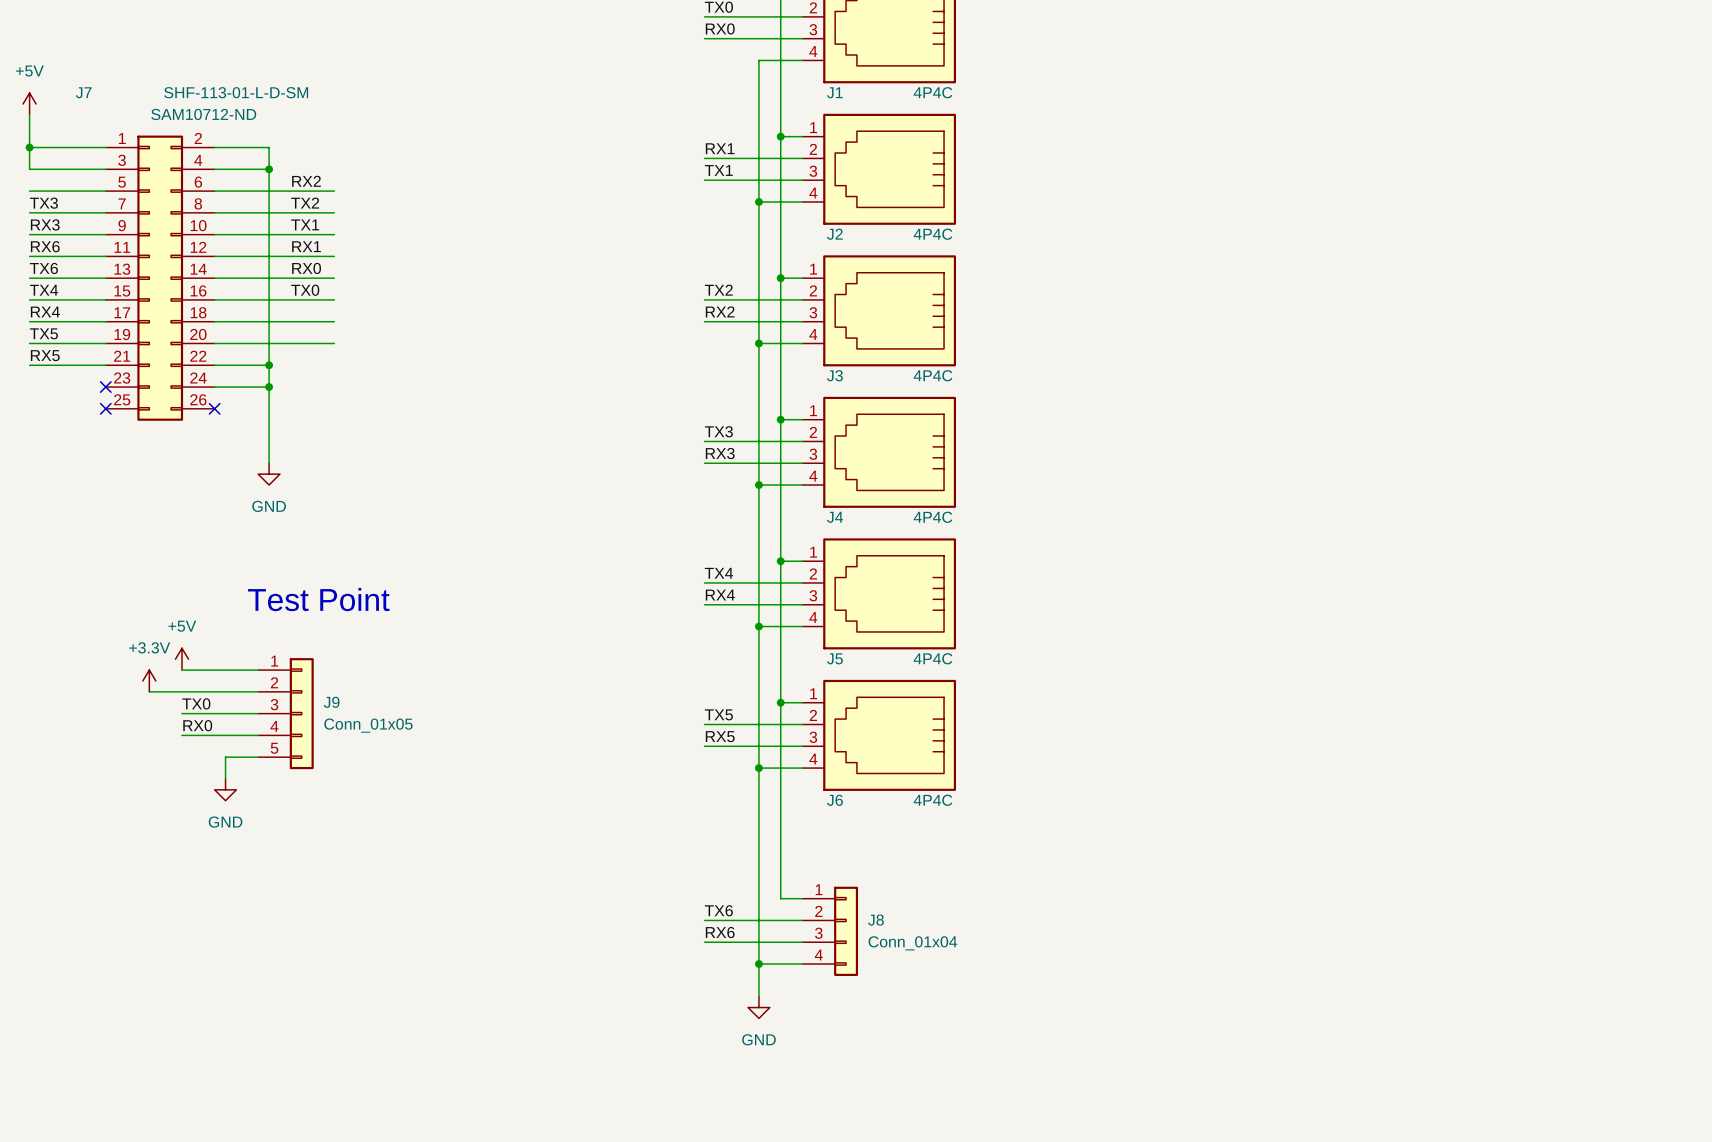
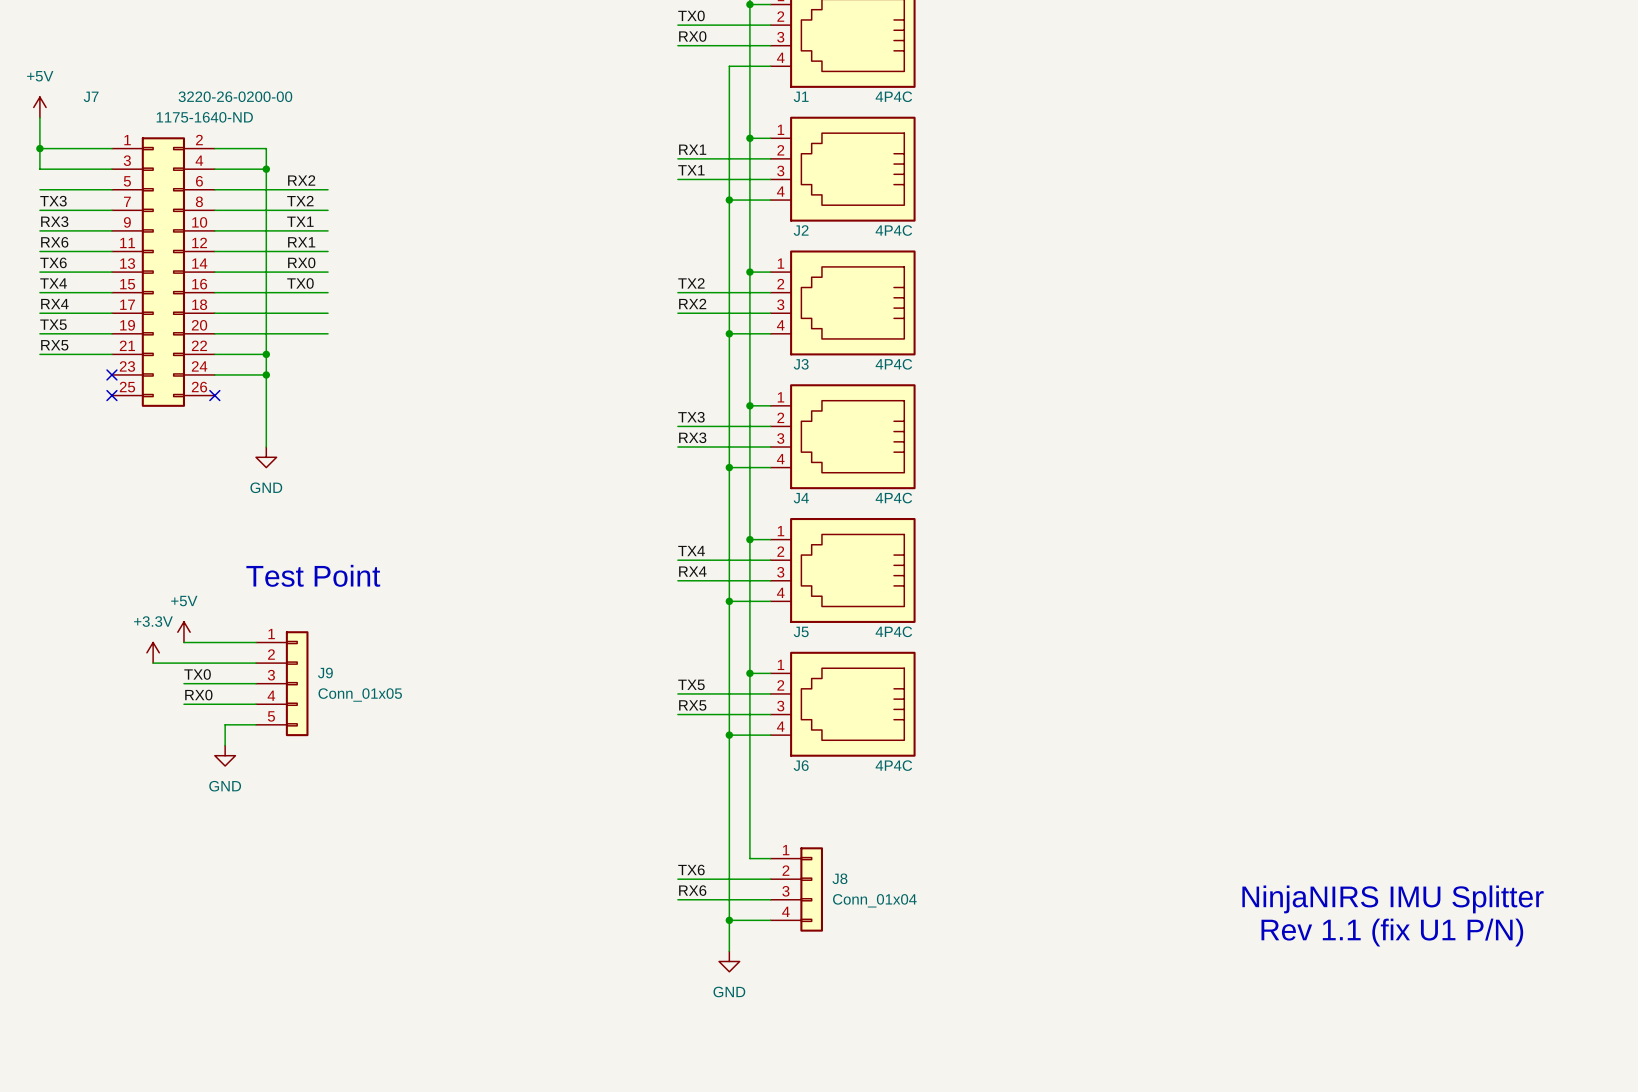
J7 value: SHF-113-01-L-D-SM (236, 92) -> 3220-26-0200-00 (235, 96)
J7 text: SAM10712-ND (203, 114) -> 1175-1640-ND (204, 117)
text: none -> NinjaNIRS IMU Splitter (1393, 899)
text: none -> Rev 1.1 (fix U1 P/N) (1392, 932)

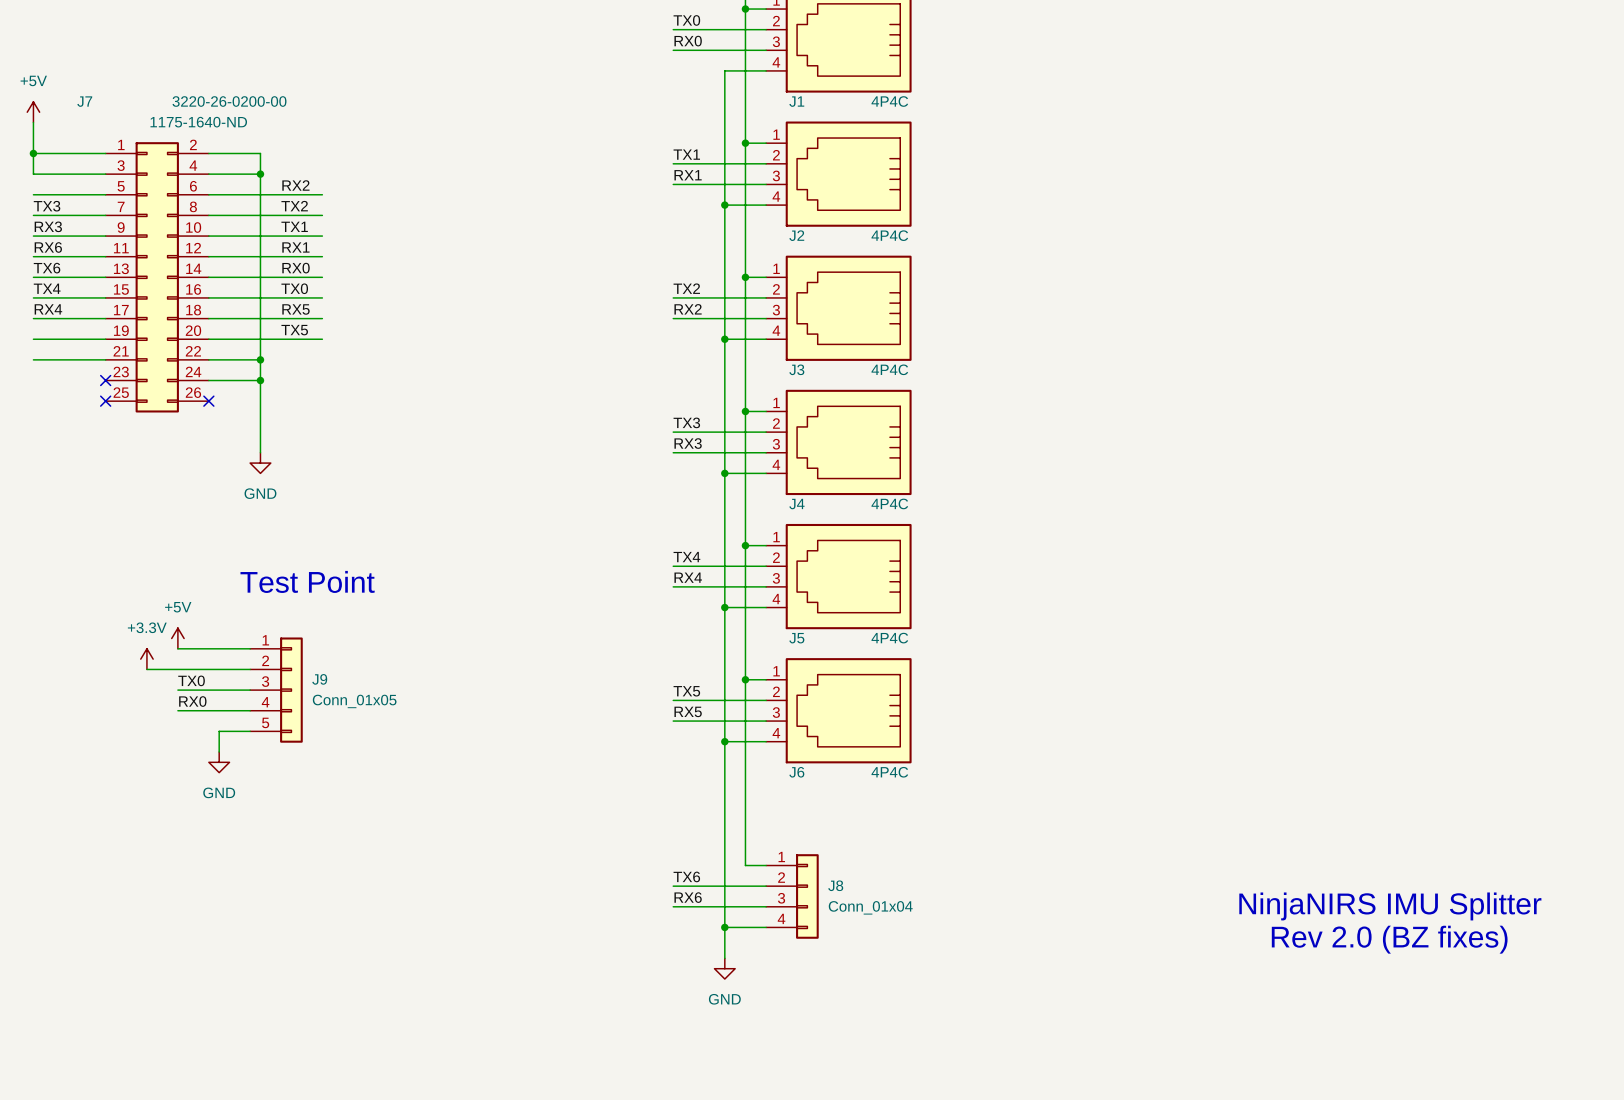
label: RX1 (692, 149) -> TX1 (686, 154)
label: TX1 (691, 170) -> RX1 (688, 175)
label: none -> RX5 (295, 309)
label: TX5 (53, 324) -> none
label: none -> TX5 (294, 330)
label: RX5 (54, 345) -> none
text: Rev 1.1 (fix U1 P/N) (1392, 932) -> Rev 2.0 (BZ fixes) (1389, 939)

